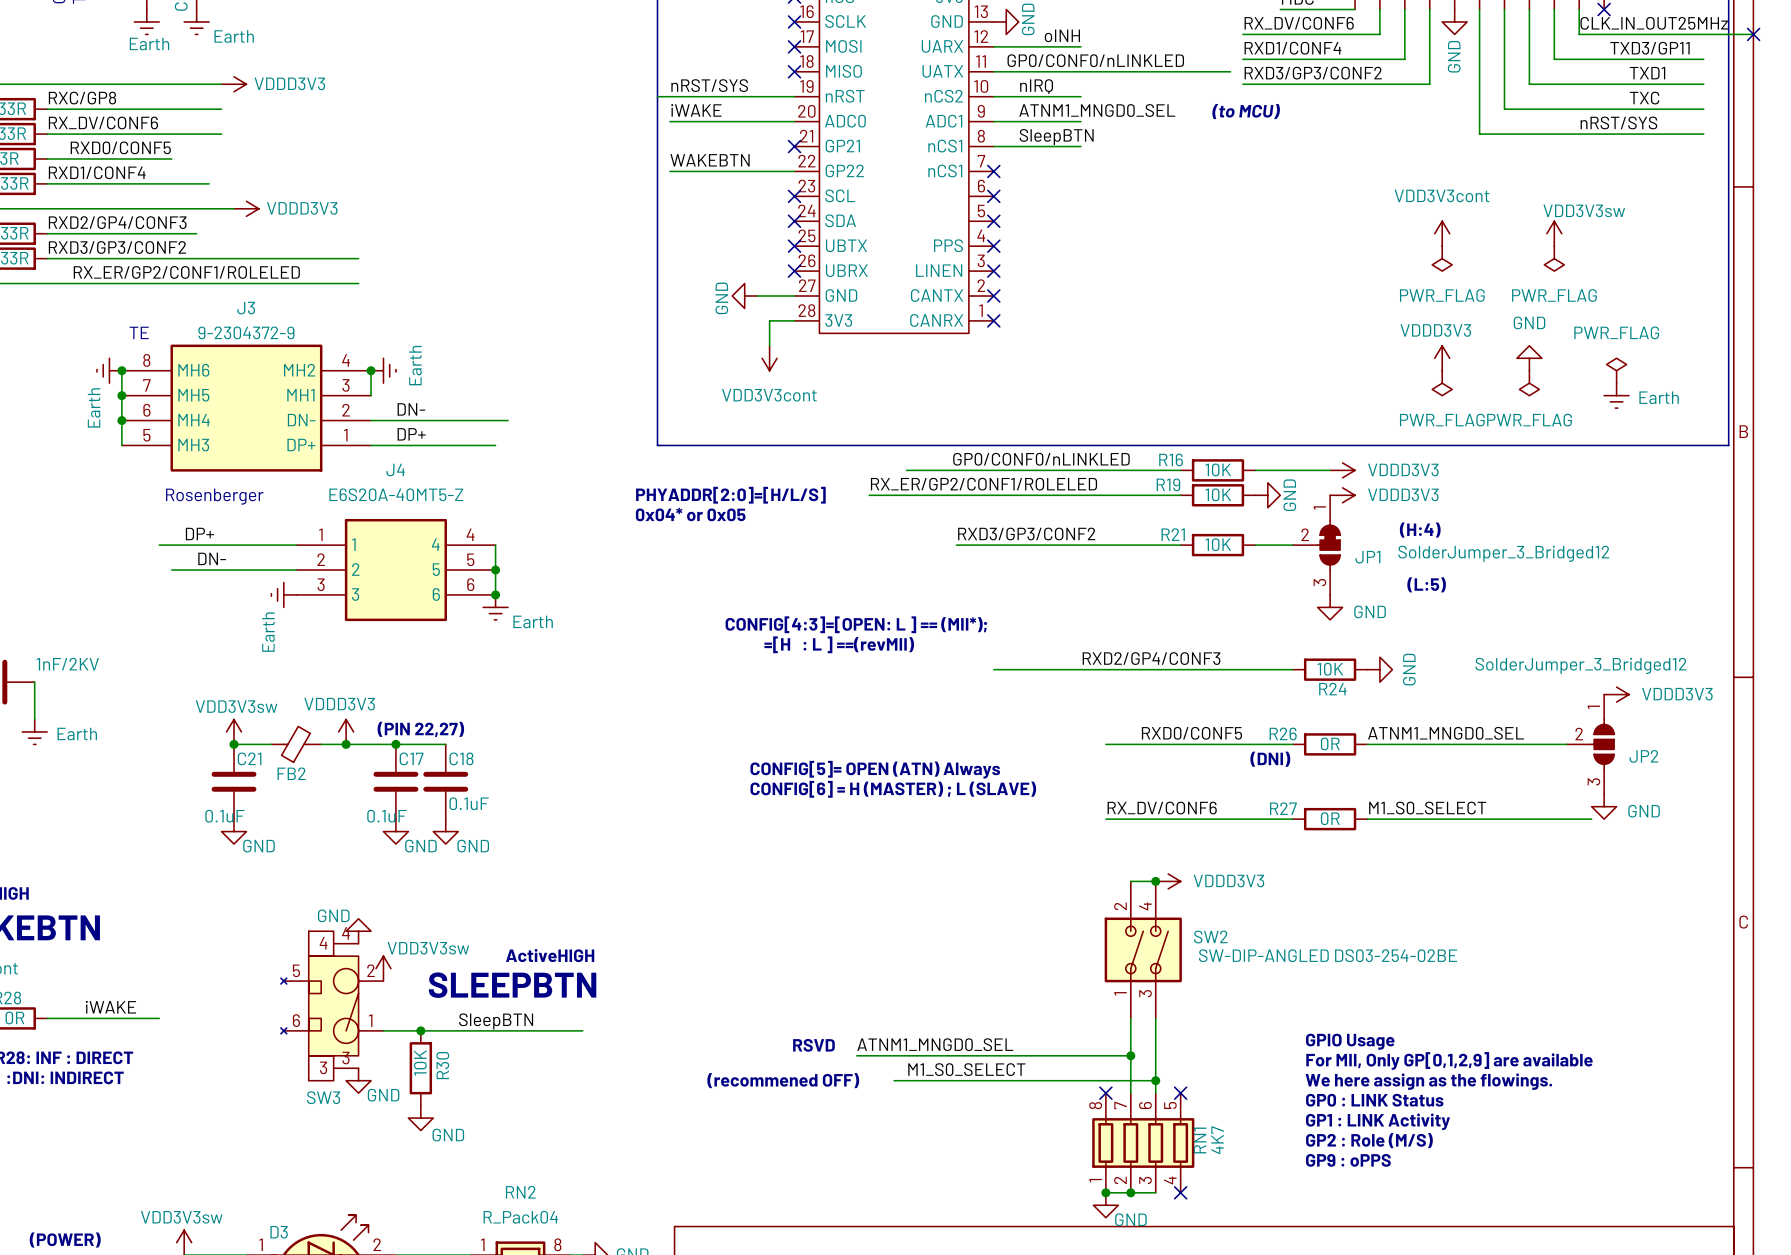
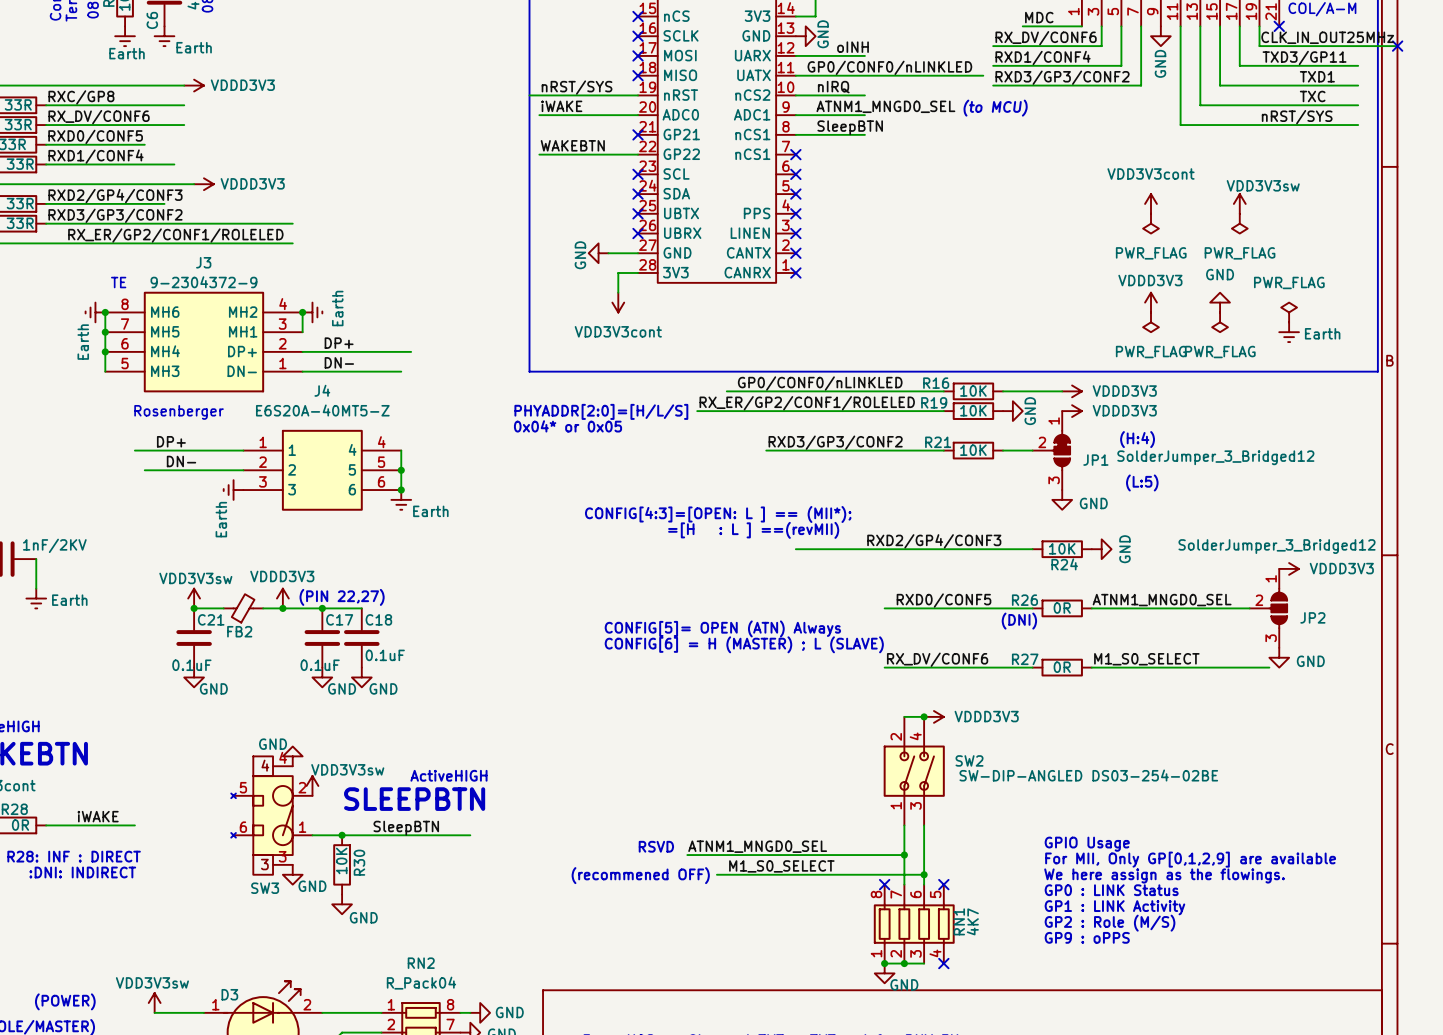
label: DN- (411, 409) -> DP+ (339, 343)
J3 pin name: DN- (301, 420) -> DP+ (242, 351)
label: DP+ (411, 434) -> DN- (339, 362)
J3 pin name: DP+ (301, 444) -> DN- (242, 371)

